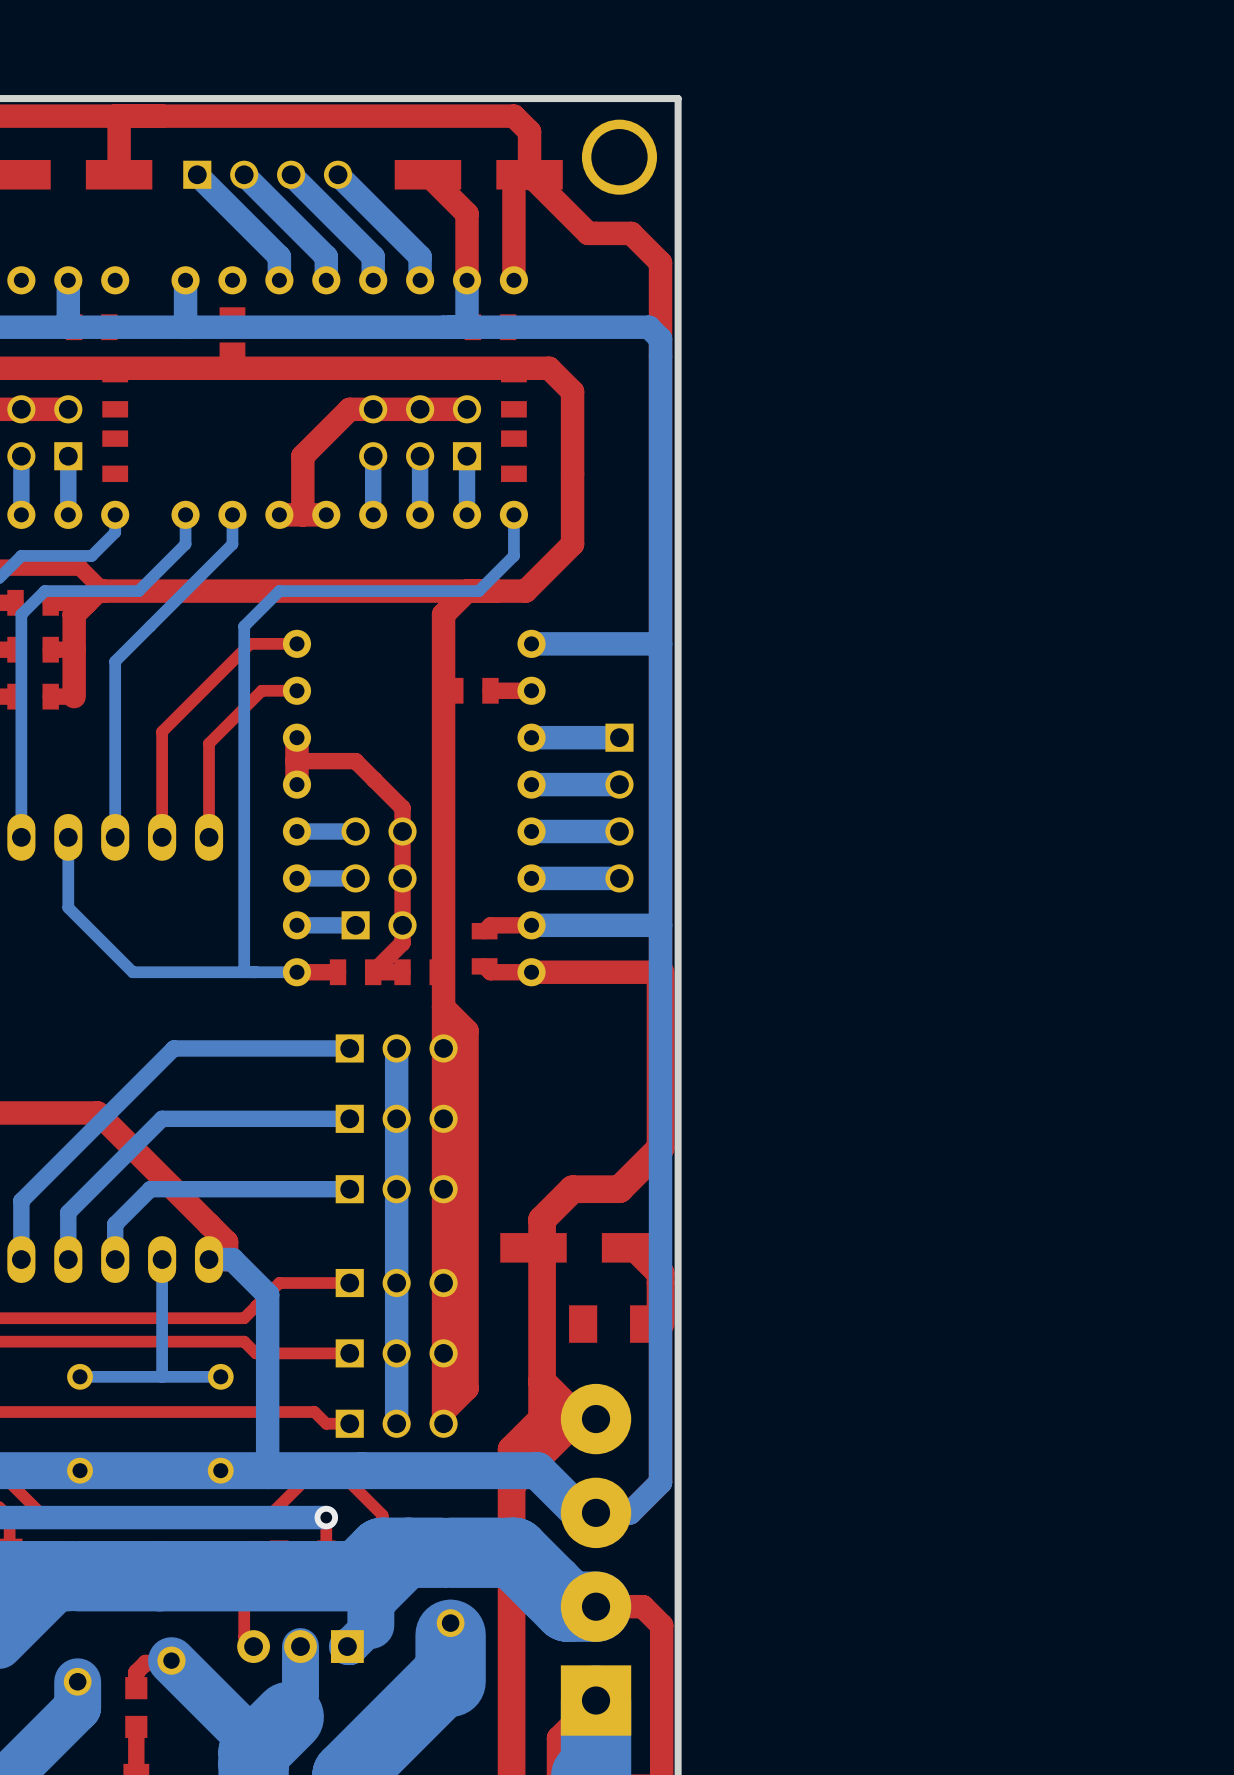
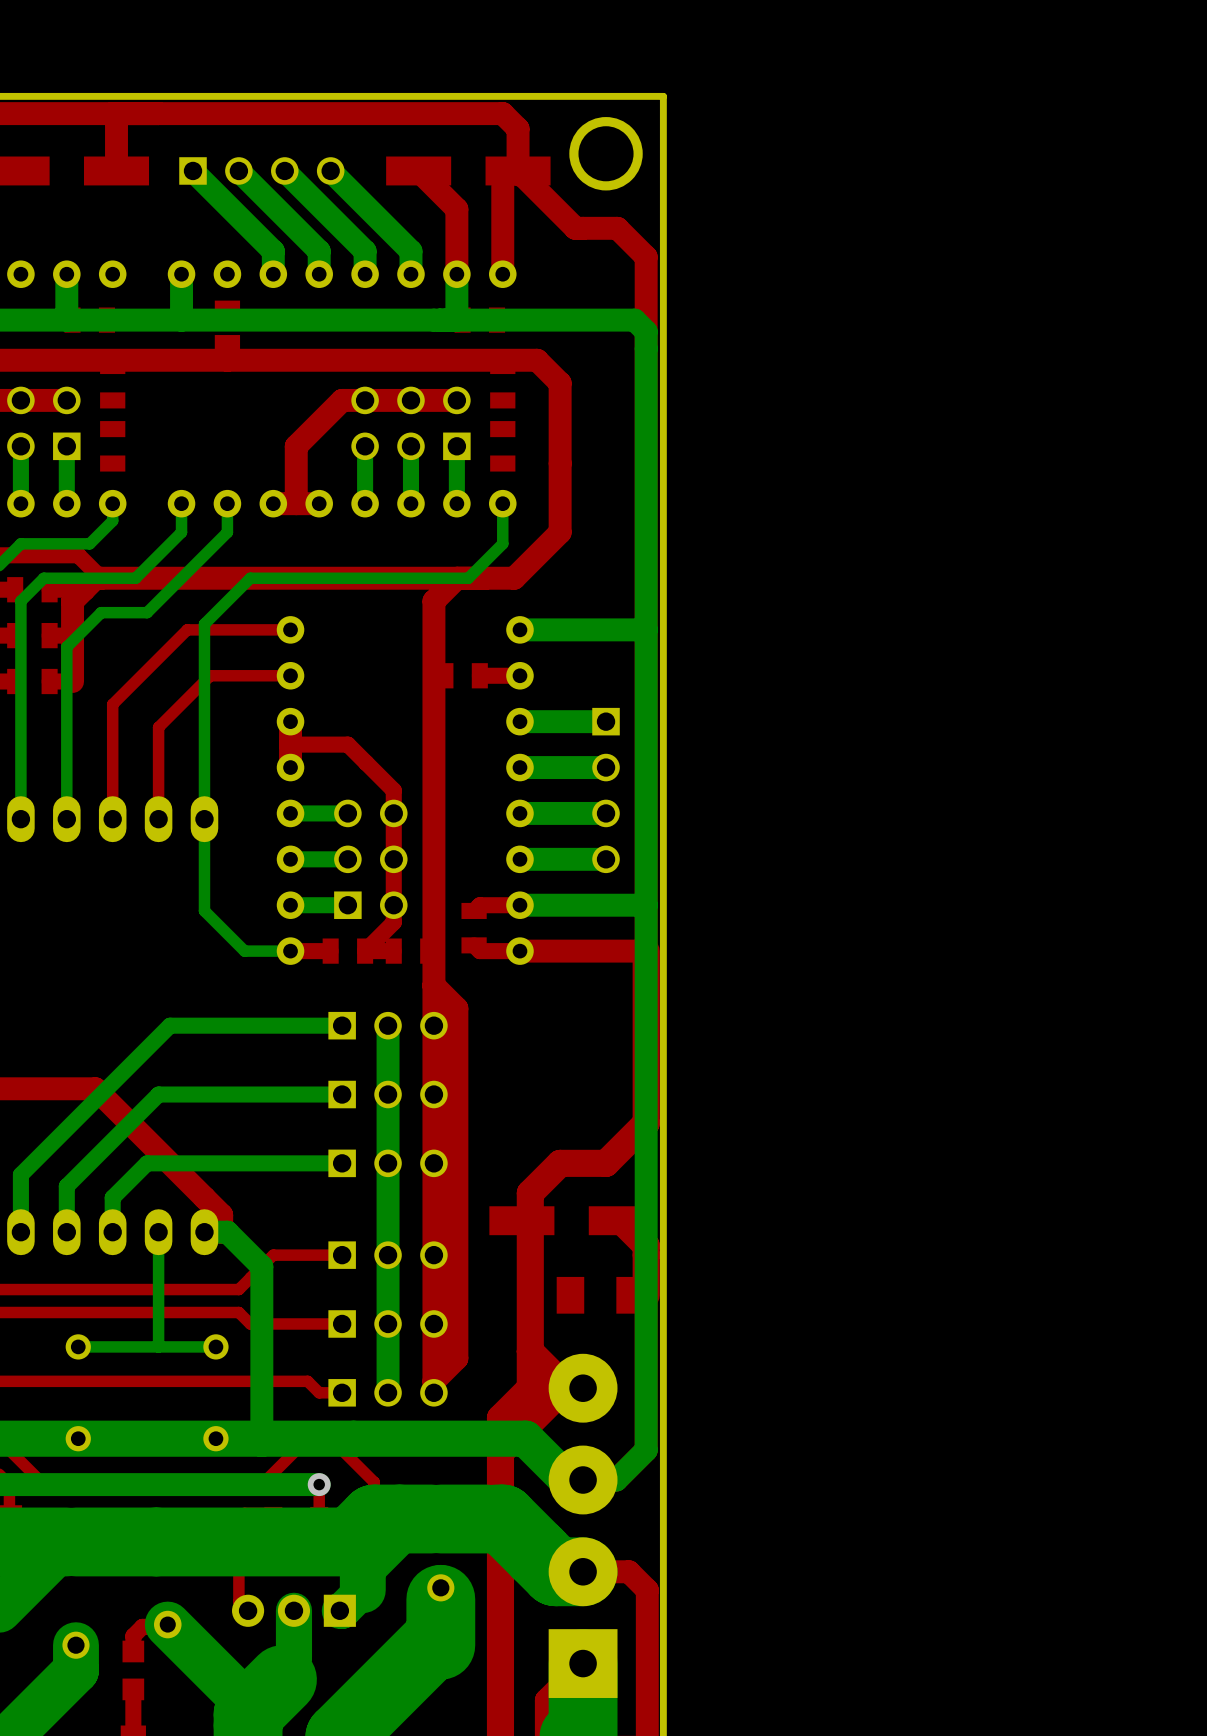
bottom track: (279, 591) (244, 626) (244, 972) -> (273, 578) (250, 578) (204, 624) (204, 910) (244, 951)
bottom track: (150, 626) (115, 661) (115, 837) -> (147, 612) (101, 612) (66, 647) (66, 819)
top track: (250, 643) (162, 731) (162, 743) -> (256, 675) (210, 675) (158, 727)
top track: none -> (244, 629) (187, 629) (112, 704) (112, 819)
top track: (261, 690) (209, 743) (209, 837) -> none
bottom track: (68, 837) (68, 907) (132, 972) (250, 972) -> none

